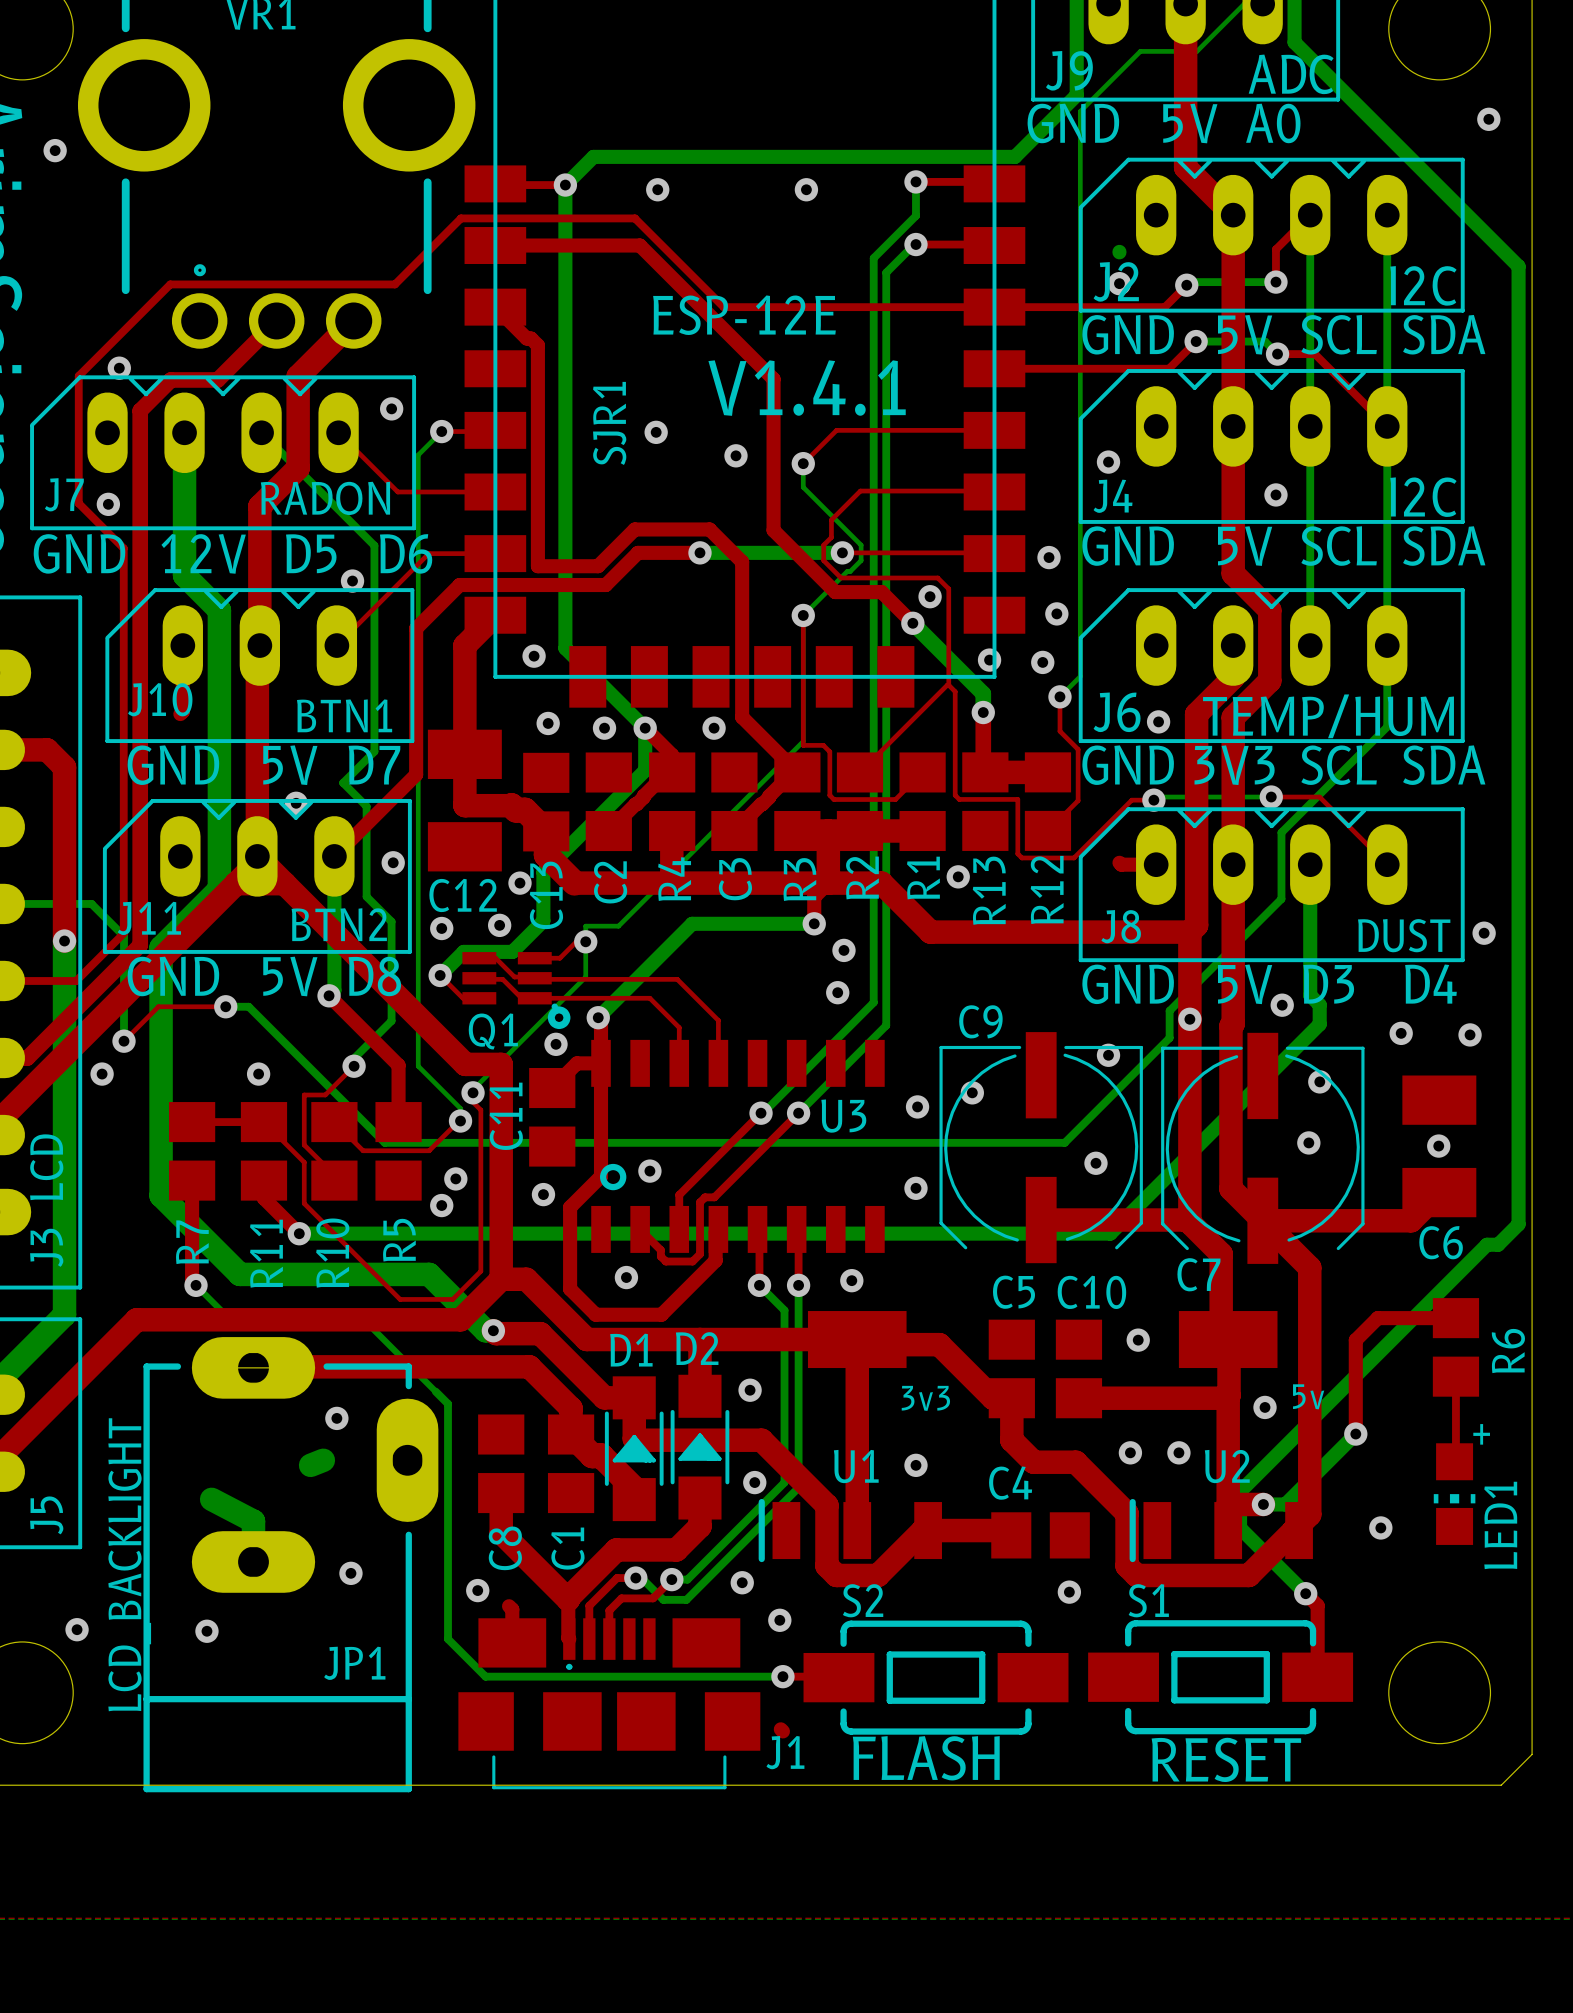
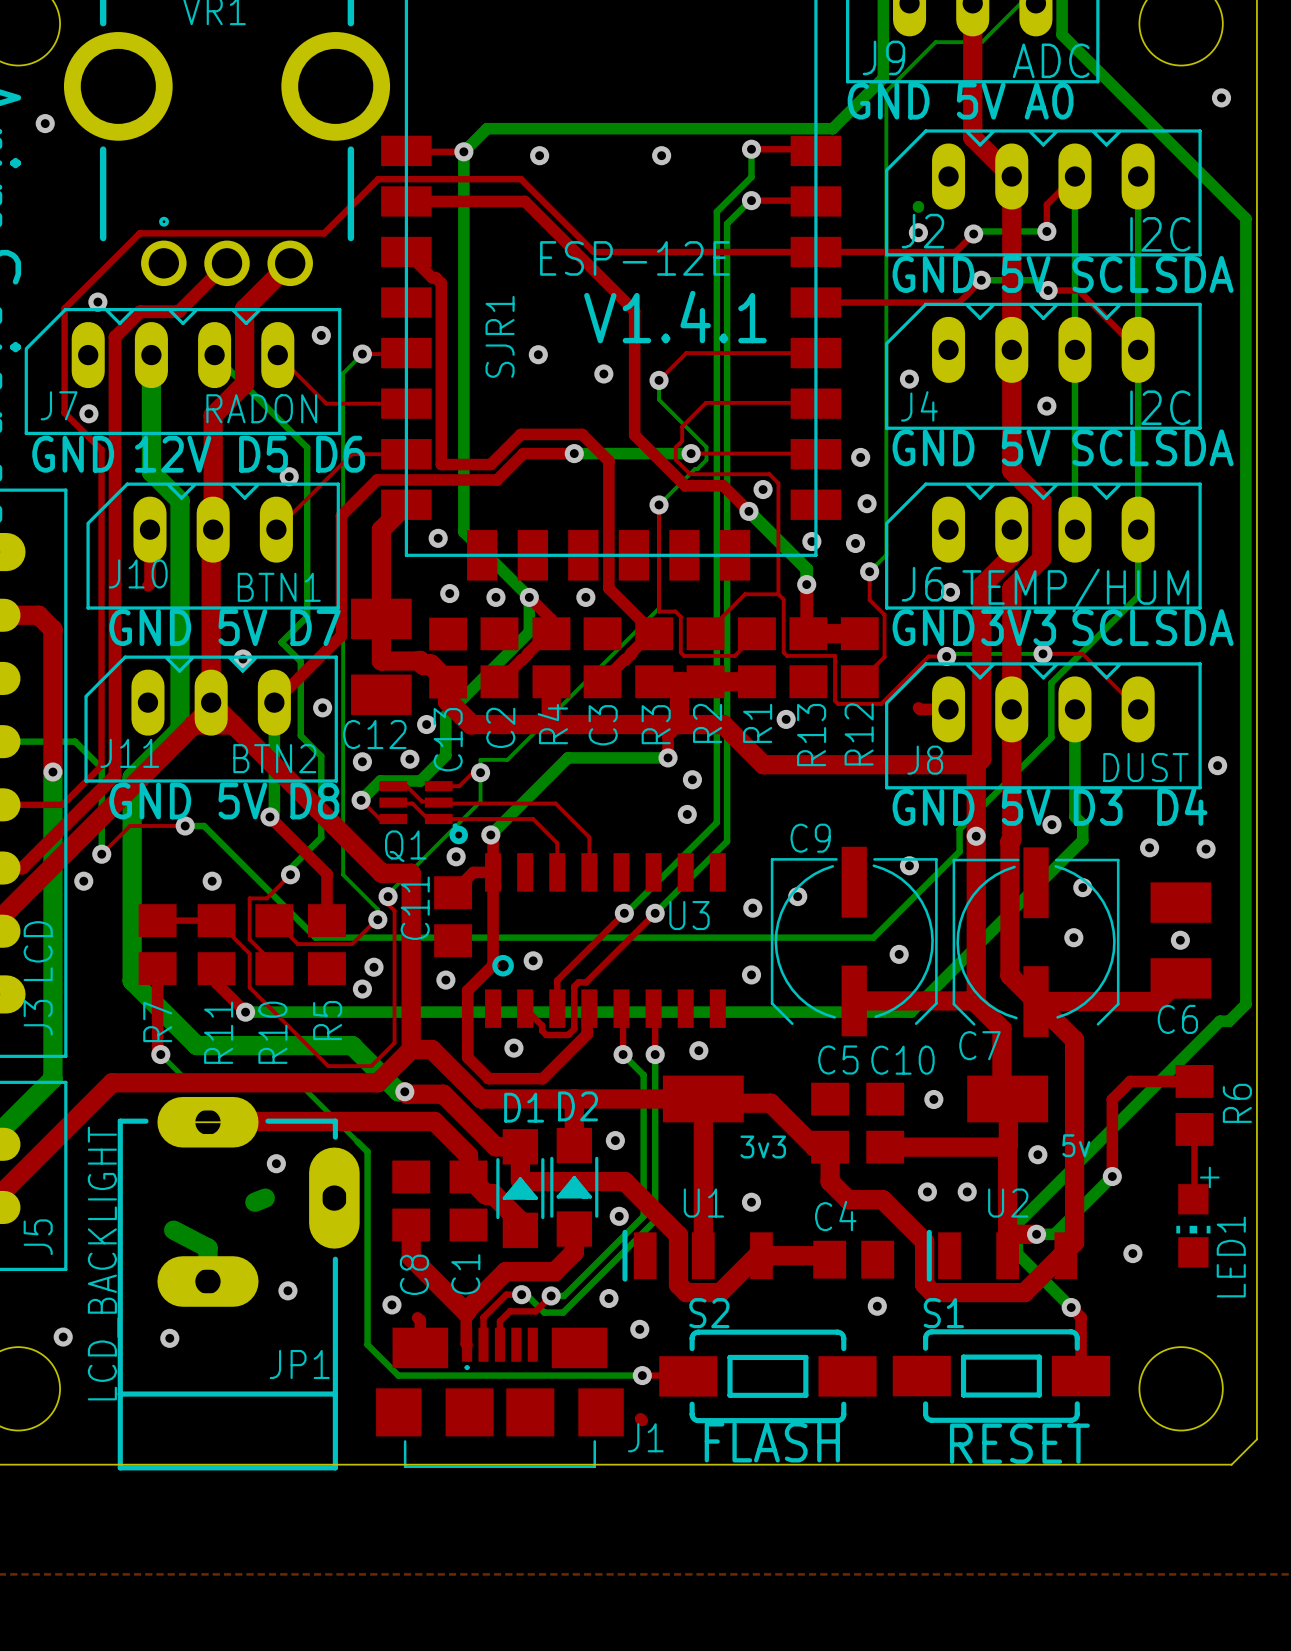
top track: none -> (778, 562) (778, 594)
top track: (908, 724) (948, 685) (955, 691) (955, 730) -> (745, 594) (778, 594)
top track: none -> (778, 594) (783, 599)

